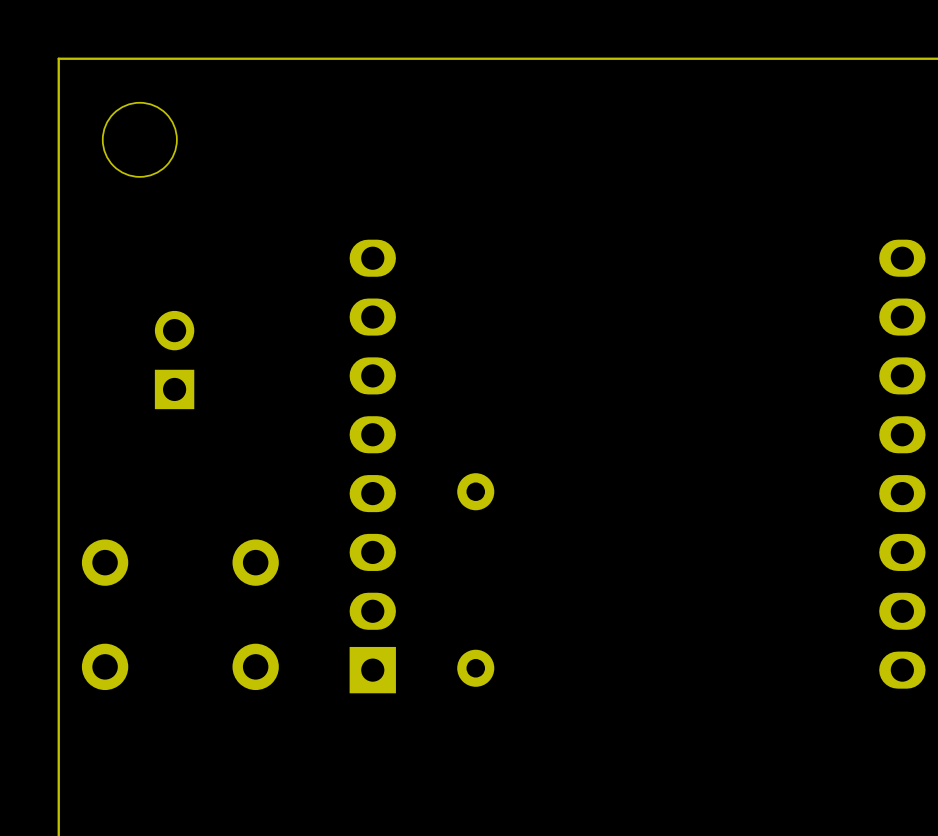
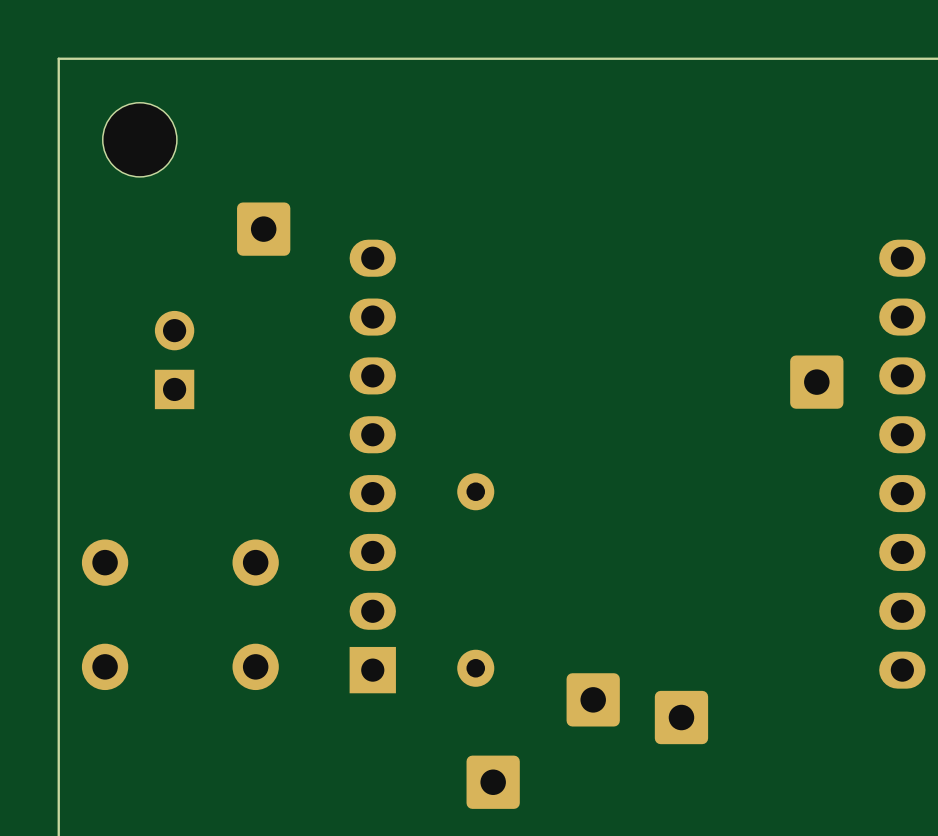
part: none -> (263, 229)
part: none -> (816, 382)
part: none -> (593, 699)
part: none -> (681, 717)
part: none -> (493, 782)

